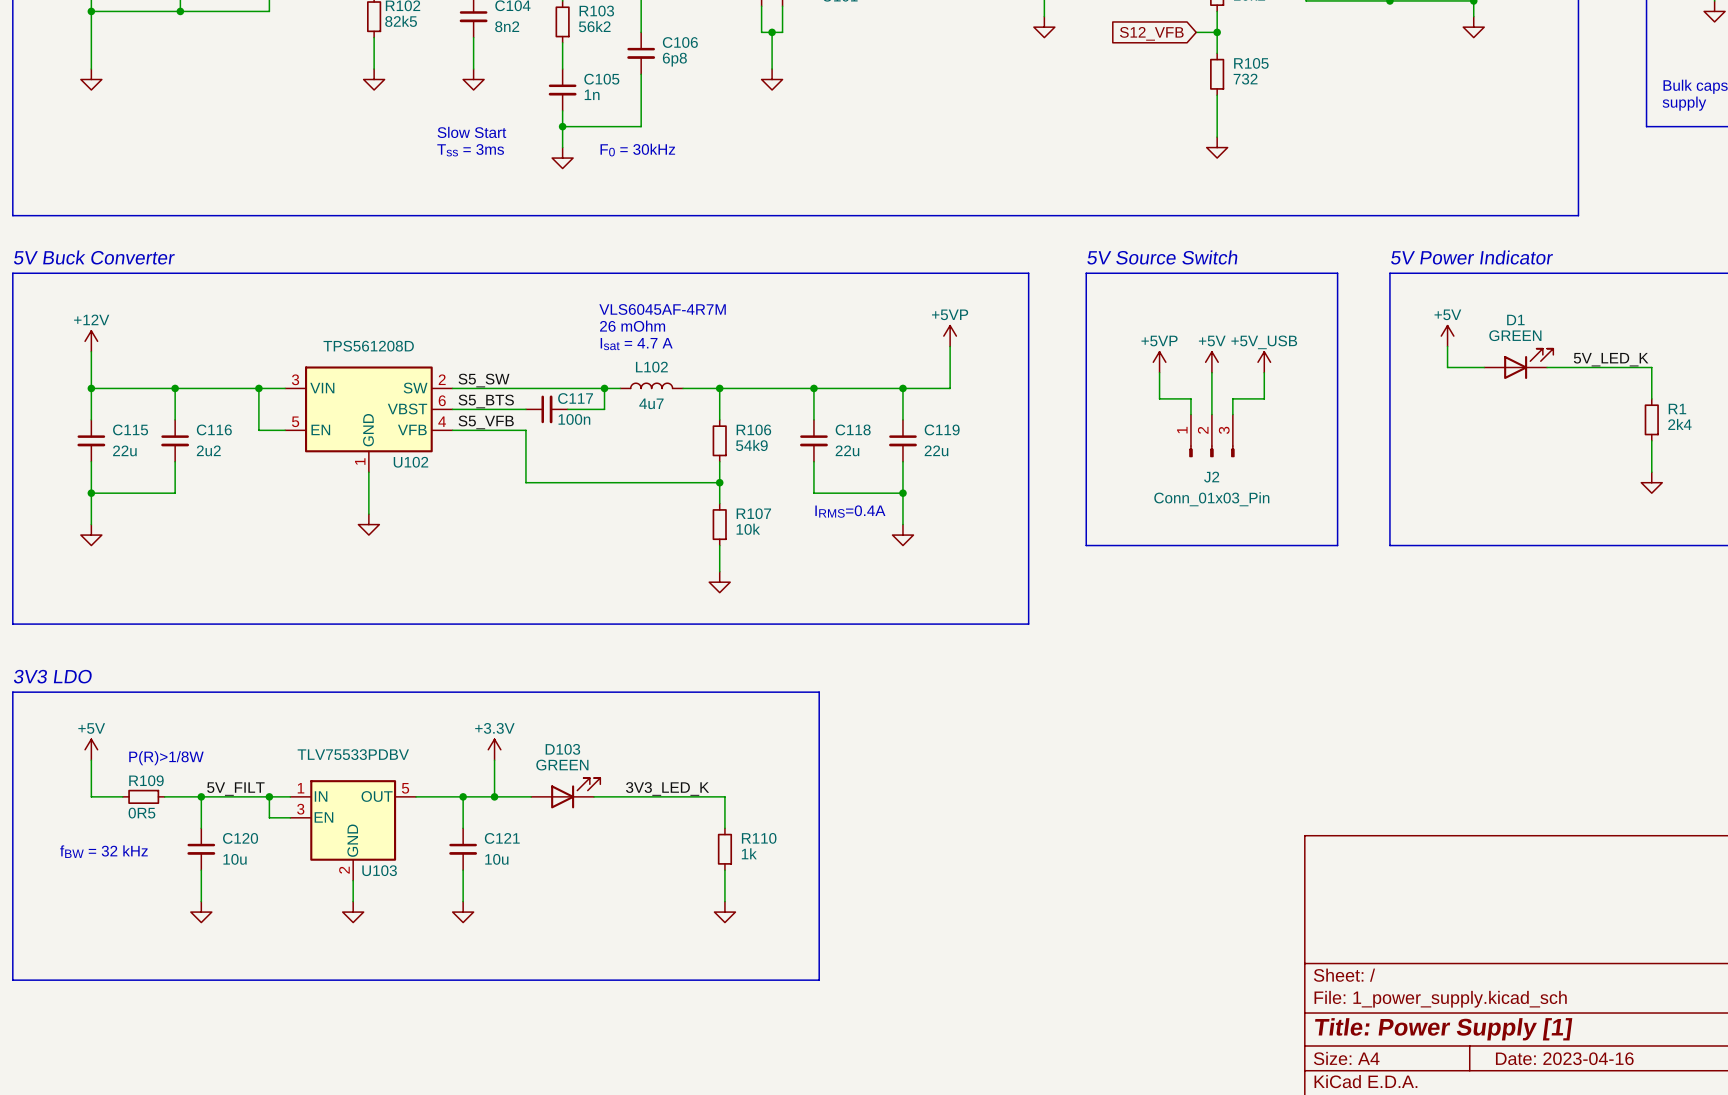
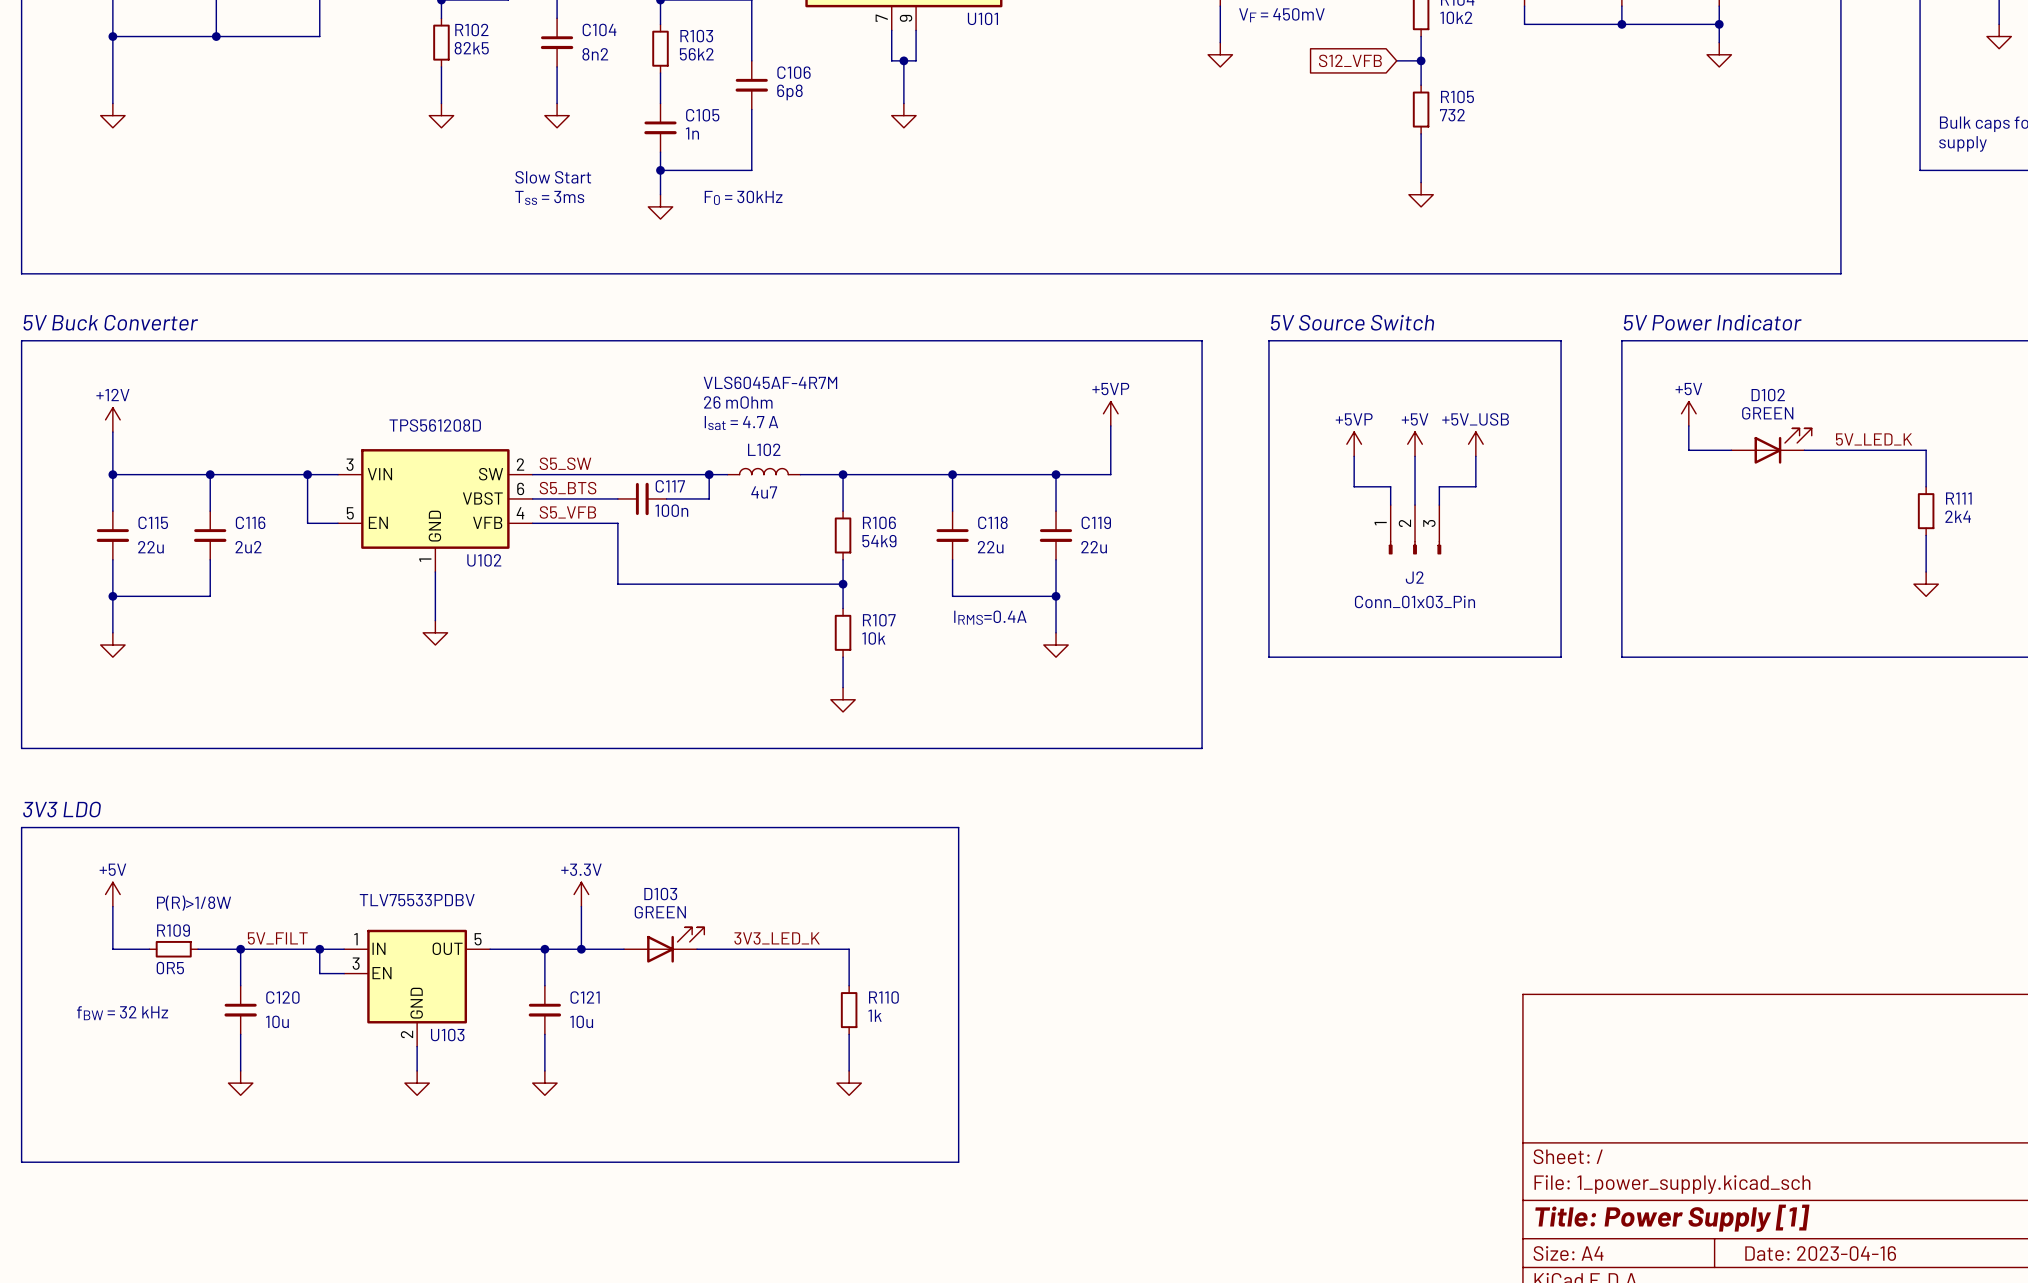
D1 name: D1 (1515, 319) -> D102 (1768, 395)
R1 name: R1 (1677, 409) -> R111 (1958, 498)

